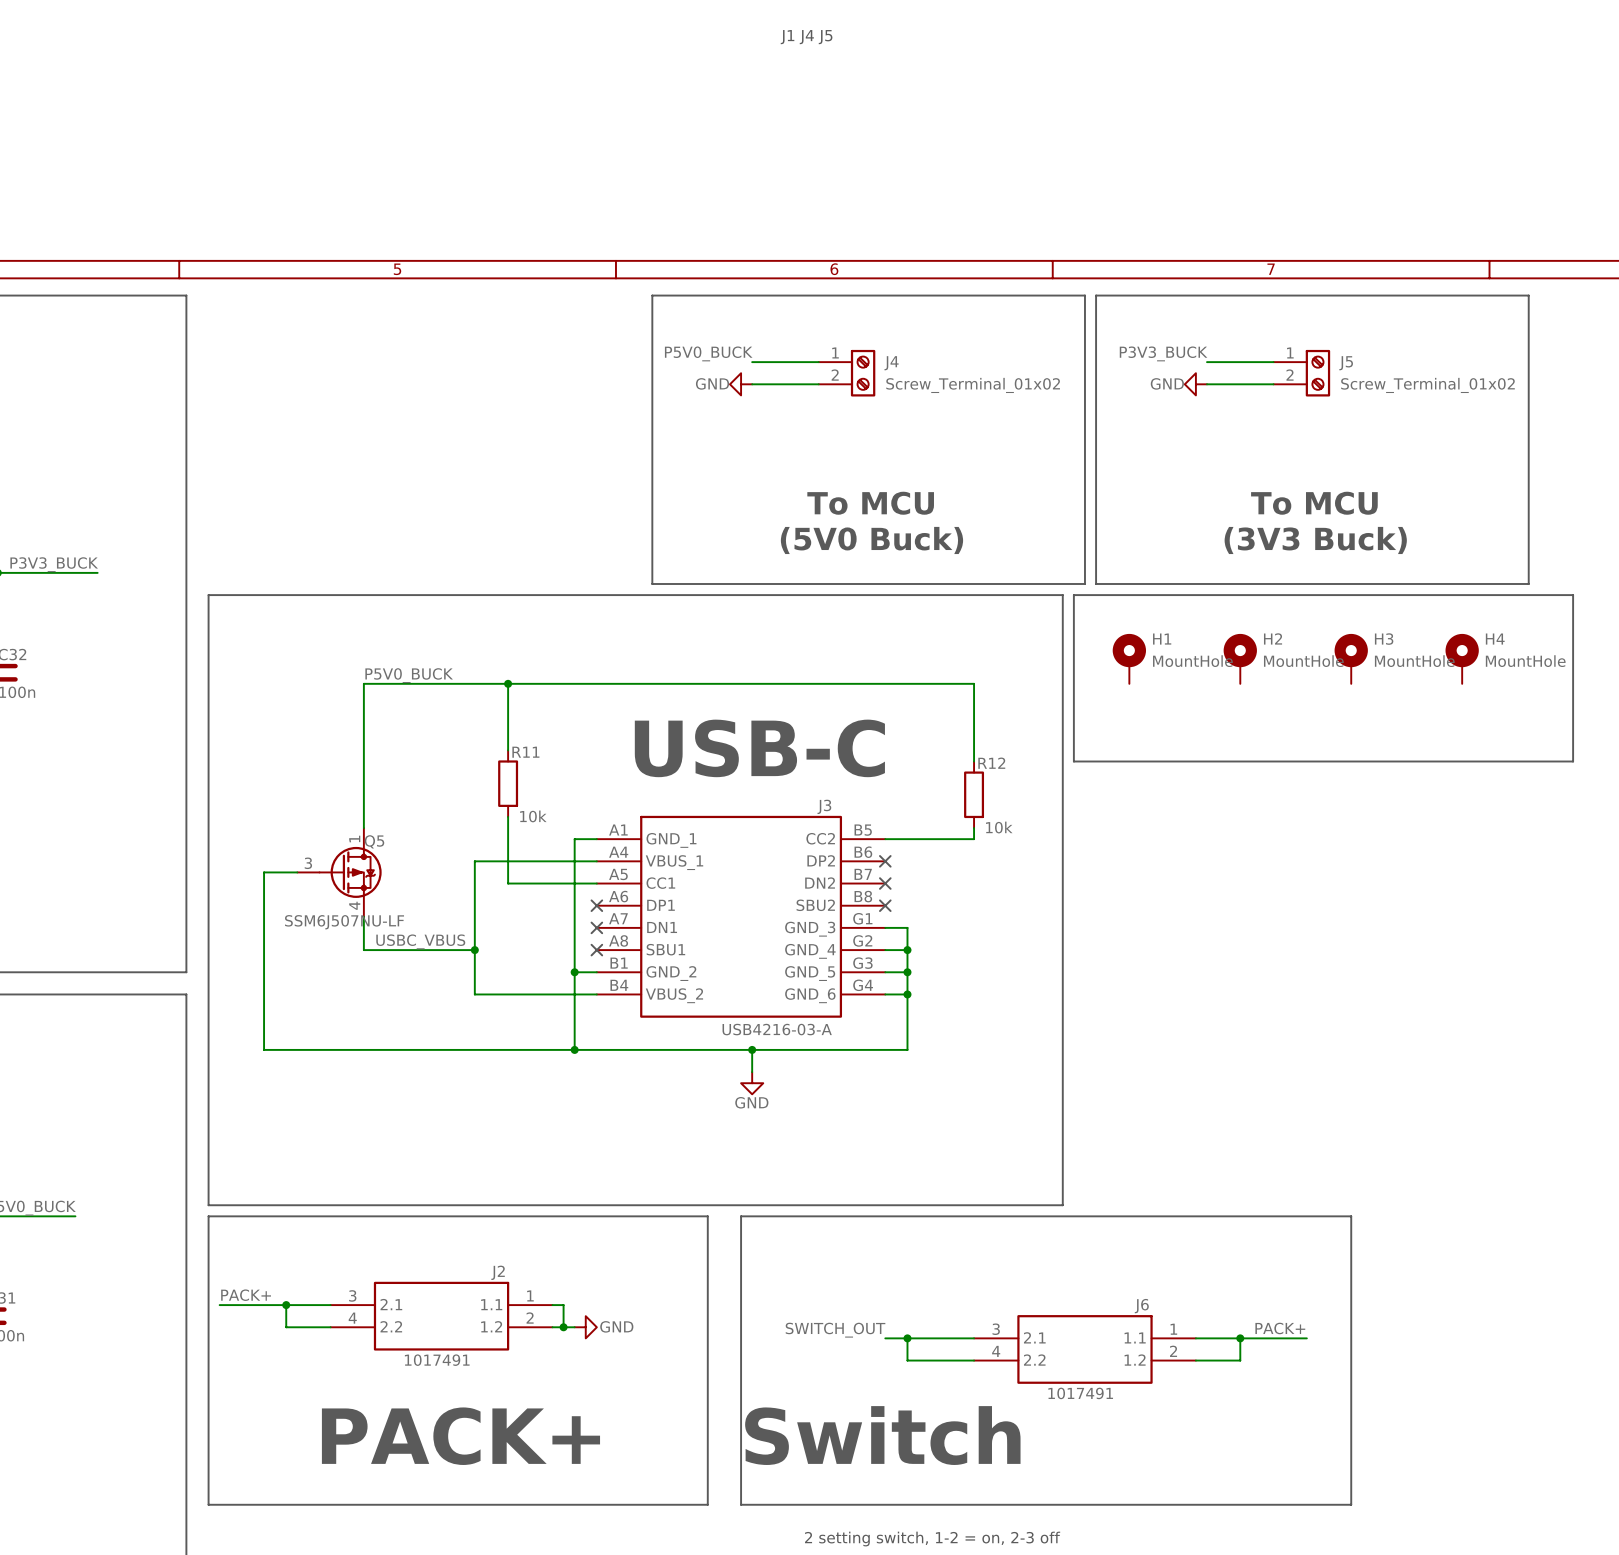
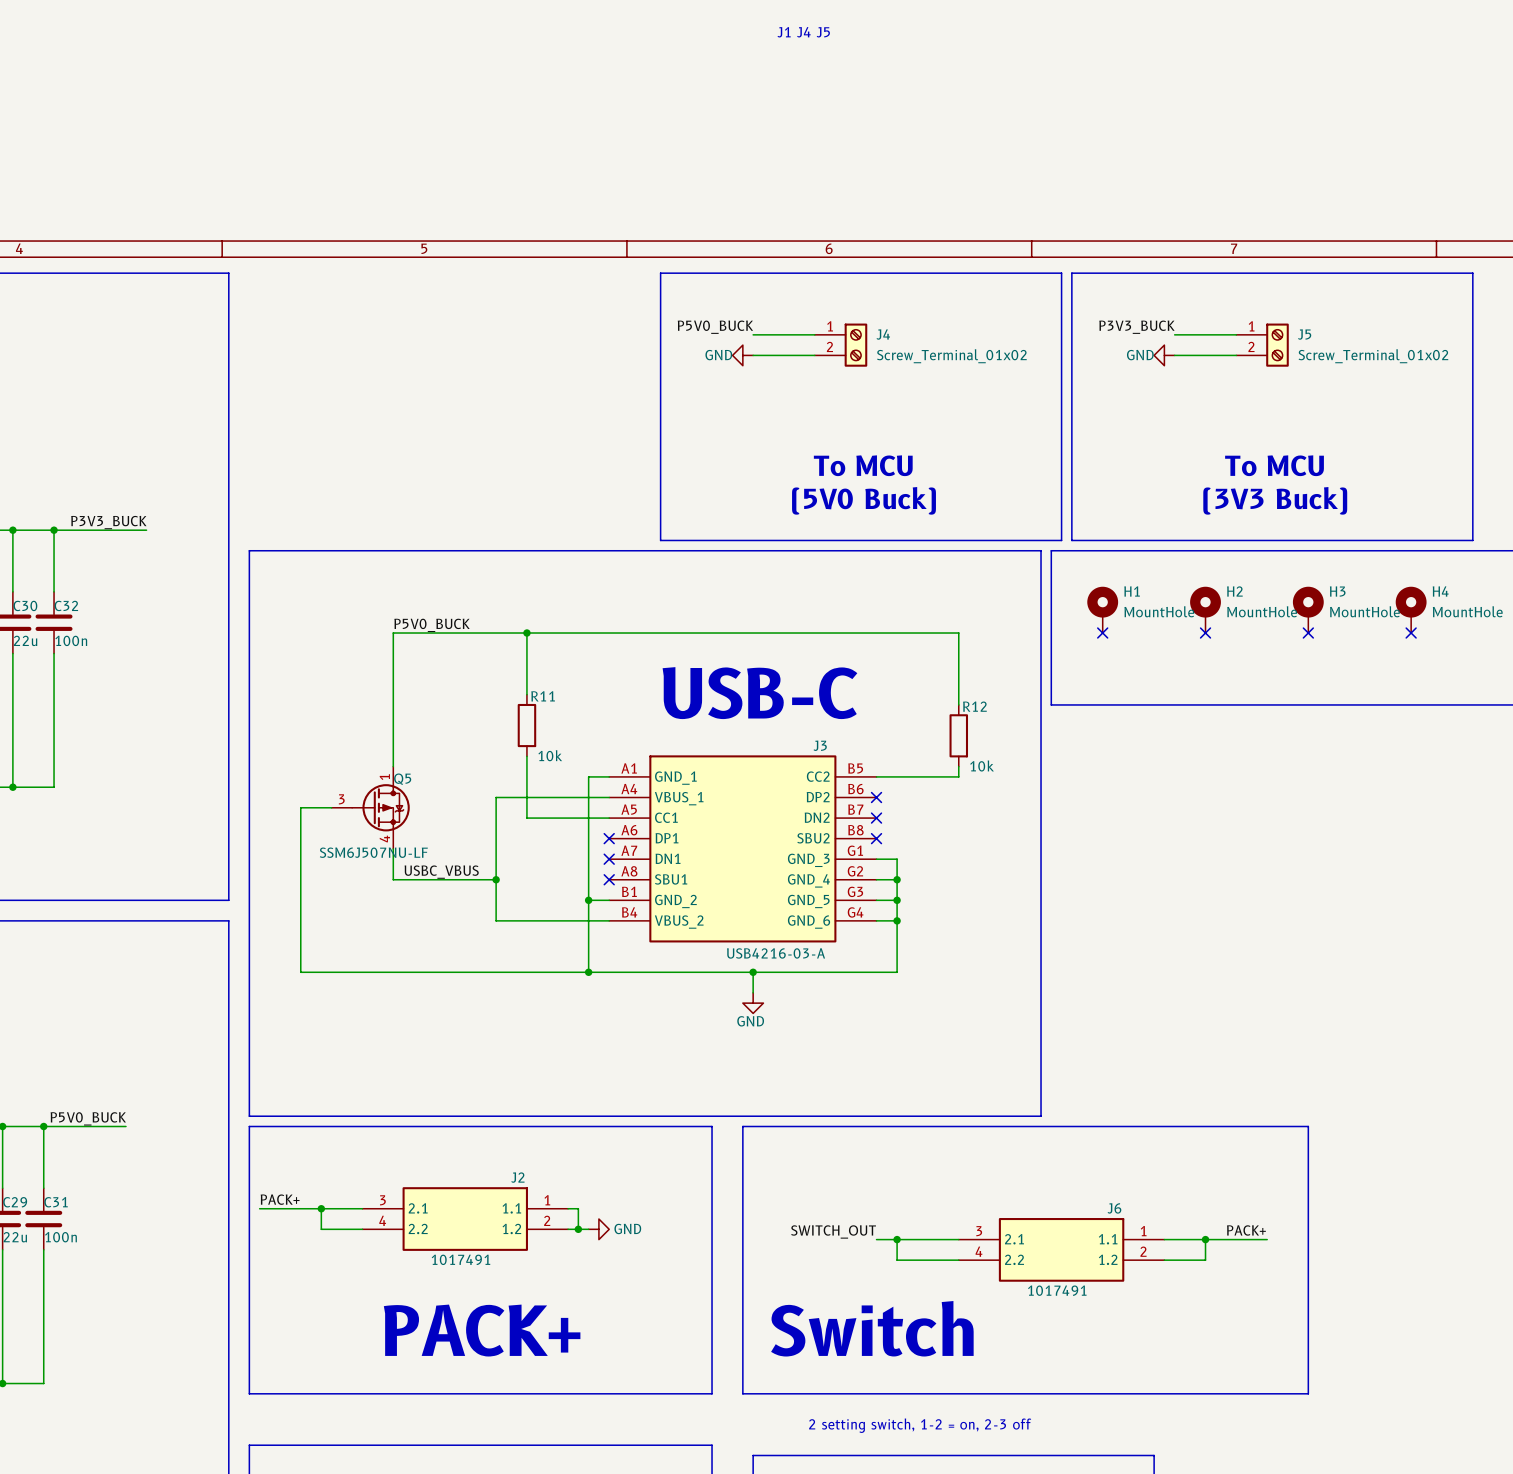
no-connect mark: none -> (1102, 633)
no-connect mark: none -> (1205, 633)
no-connect mark: none -> (1308, 633)
no-connect mark: none -> (1411, 633)

